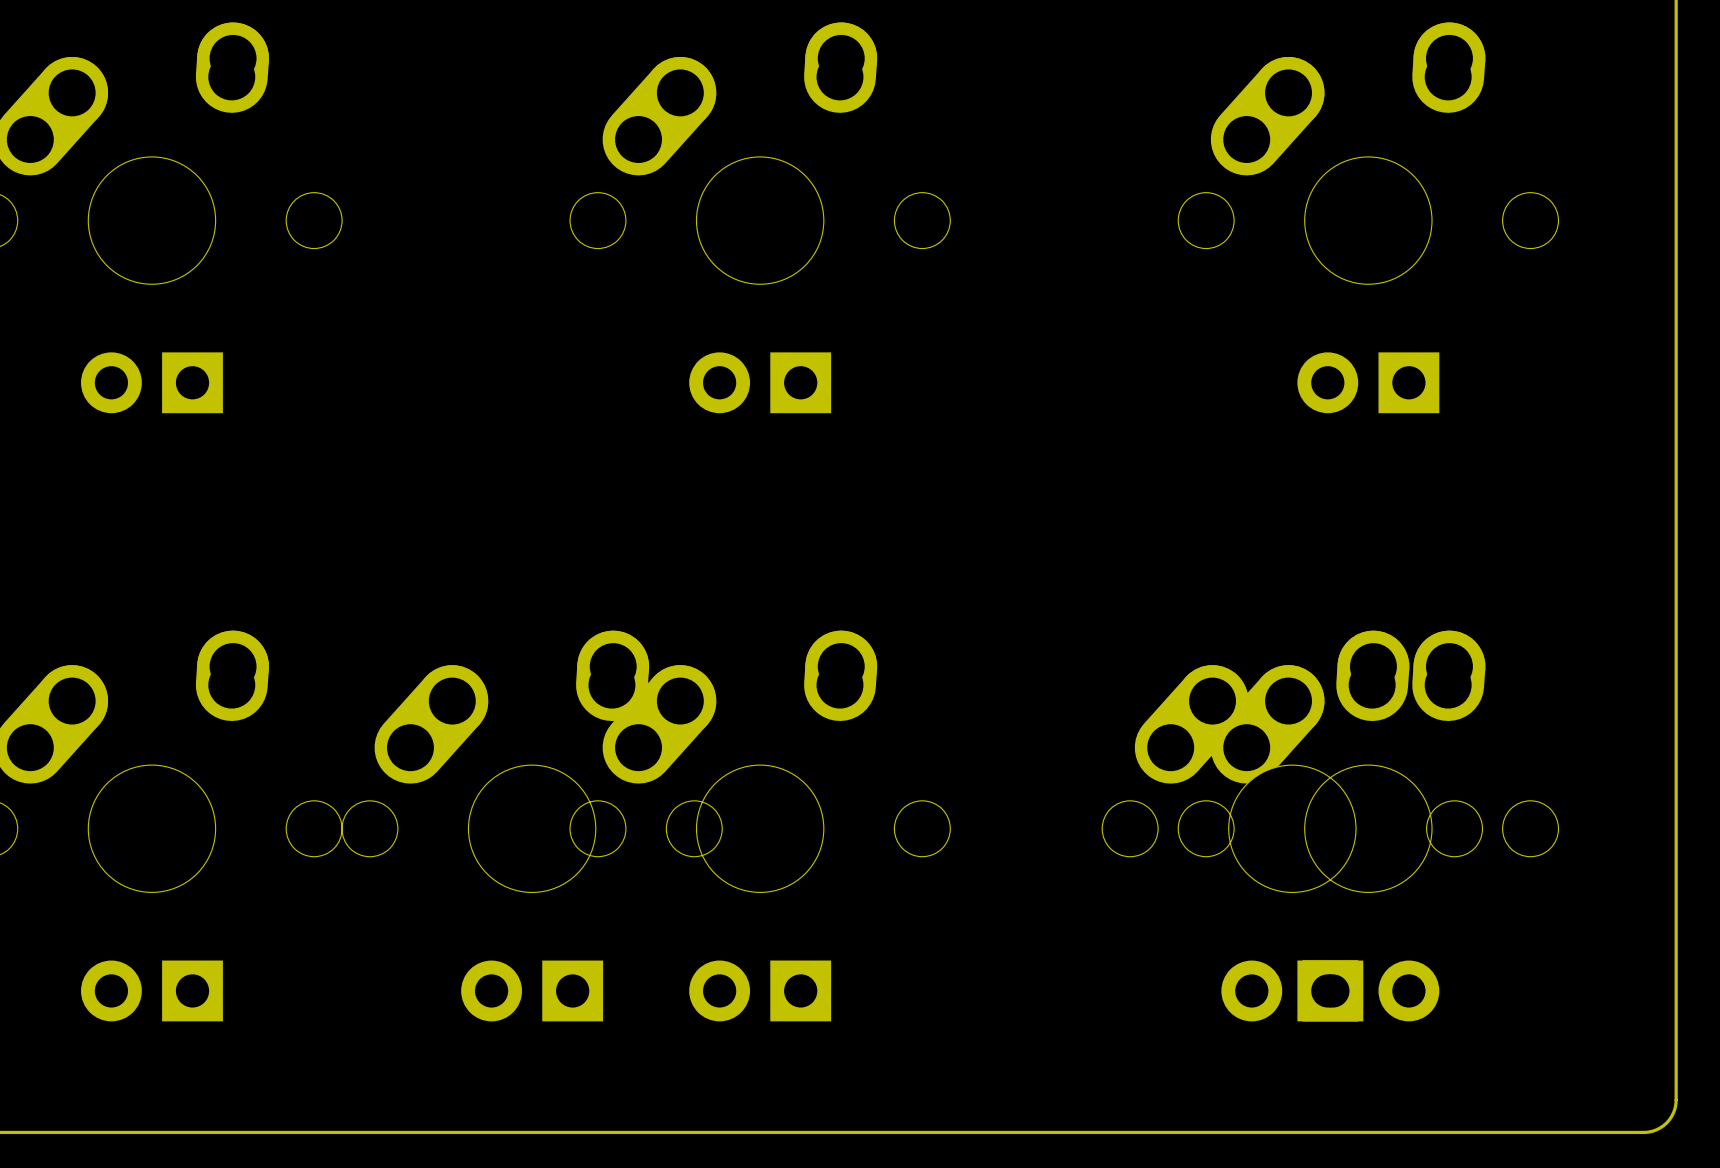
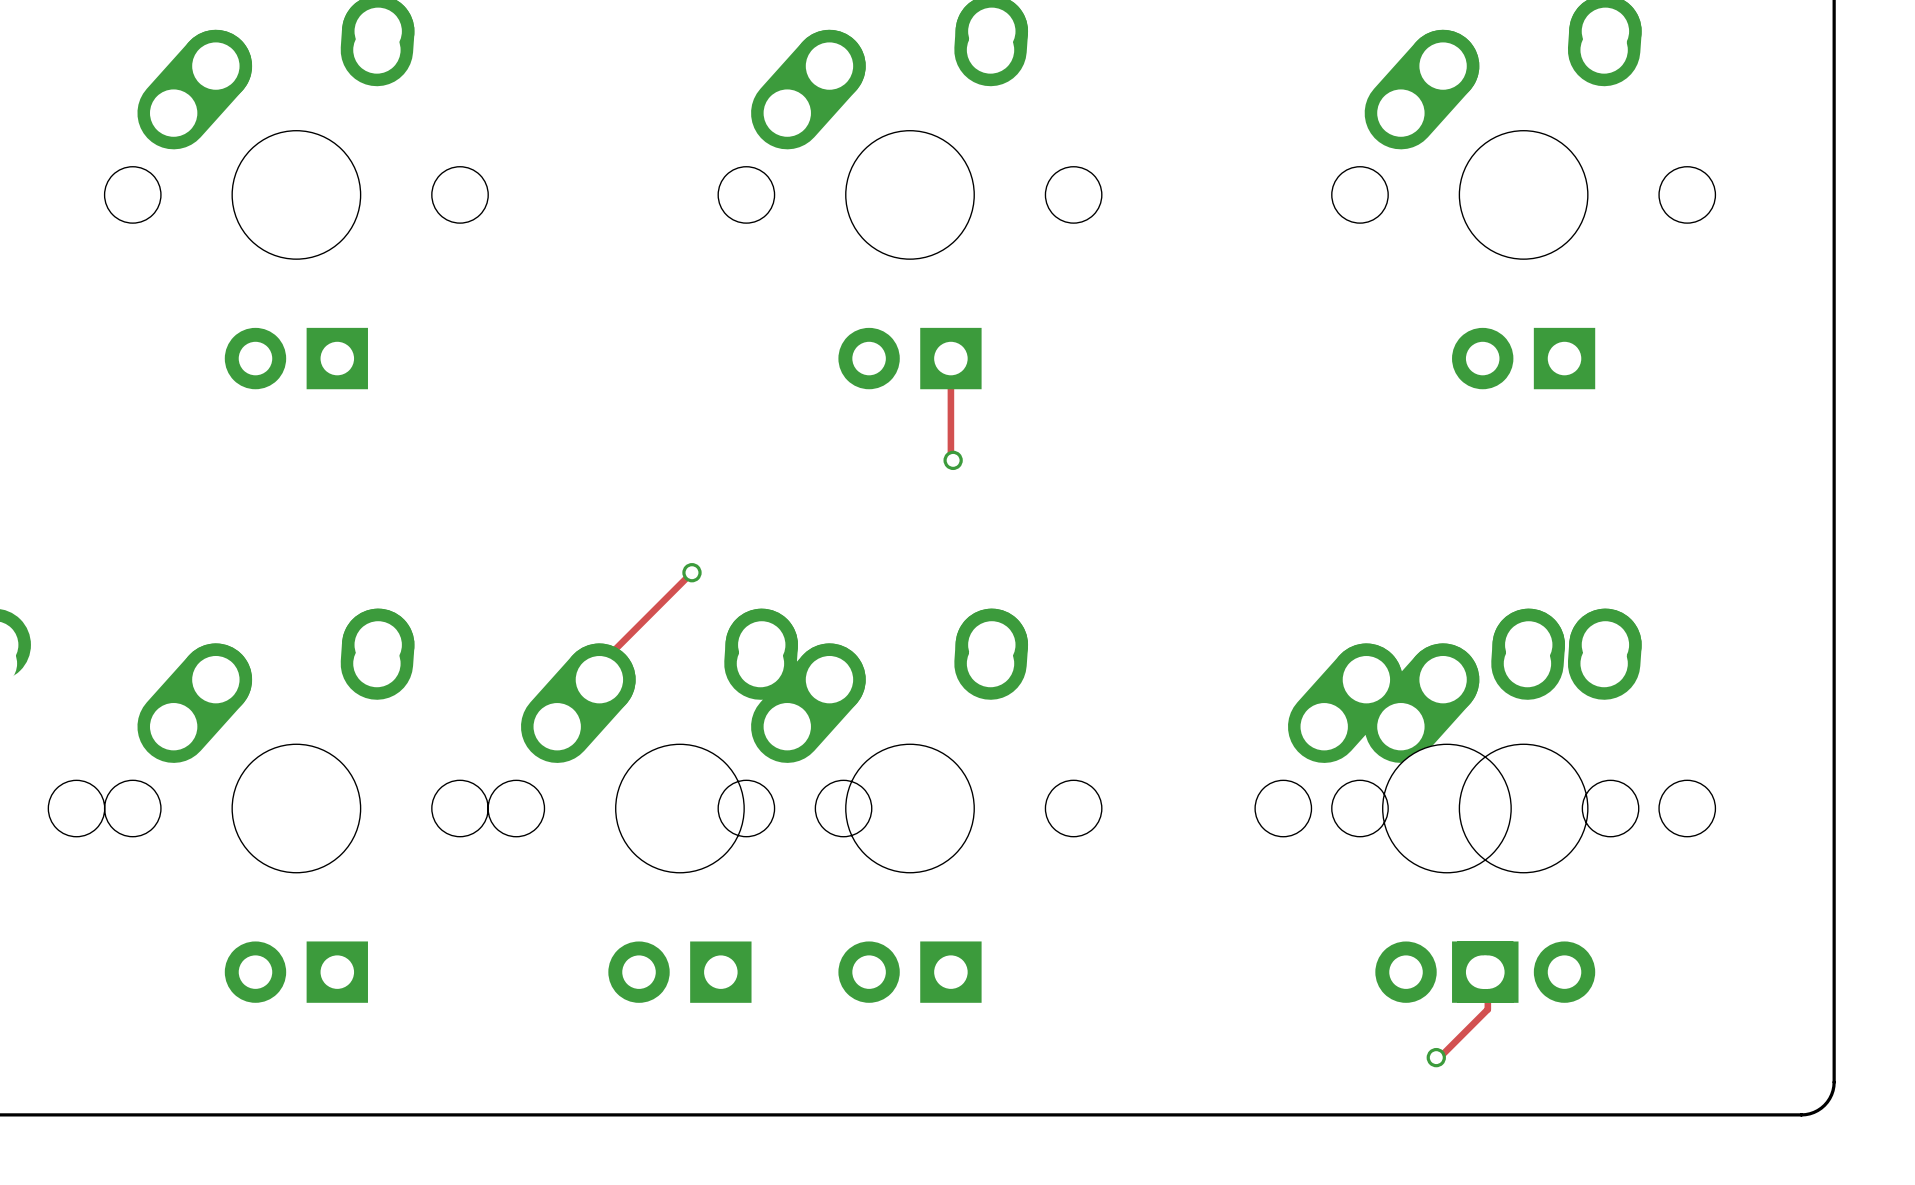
track: none -> (950, 358) (950, 458) (953, 460)
via: none -> (953, 460)
track: none -> (691, 572) (557, 707) (557, 726)
via: none -> (691, 572)
track: none -> (1487, 972) (1487, 1009) (1439, 1057) (1436, 1057)
via: none -> (1436, 1057)

